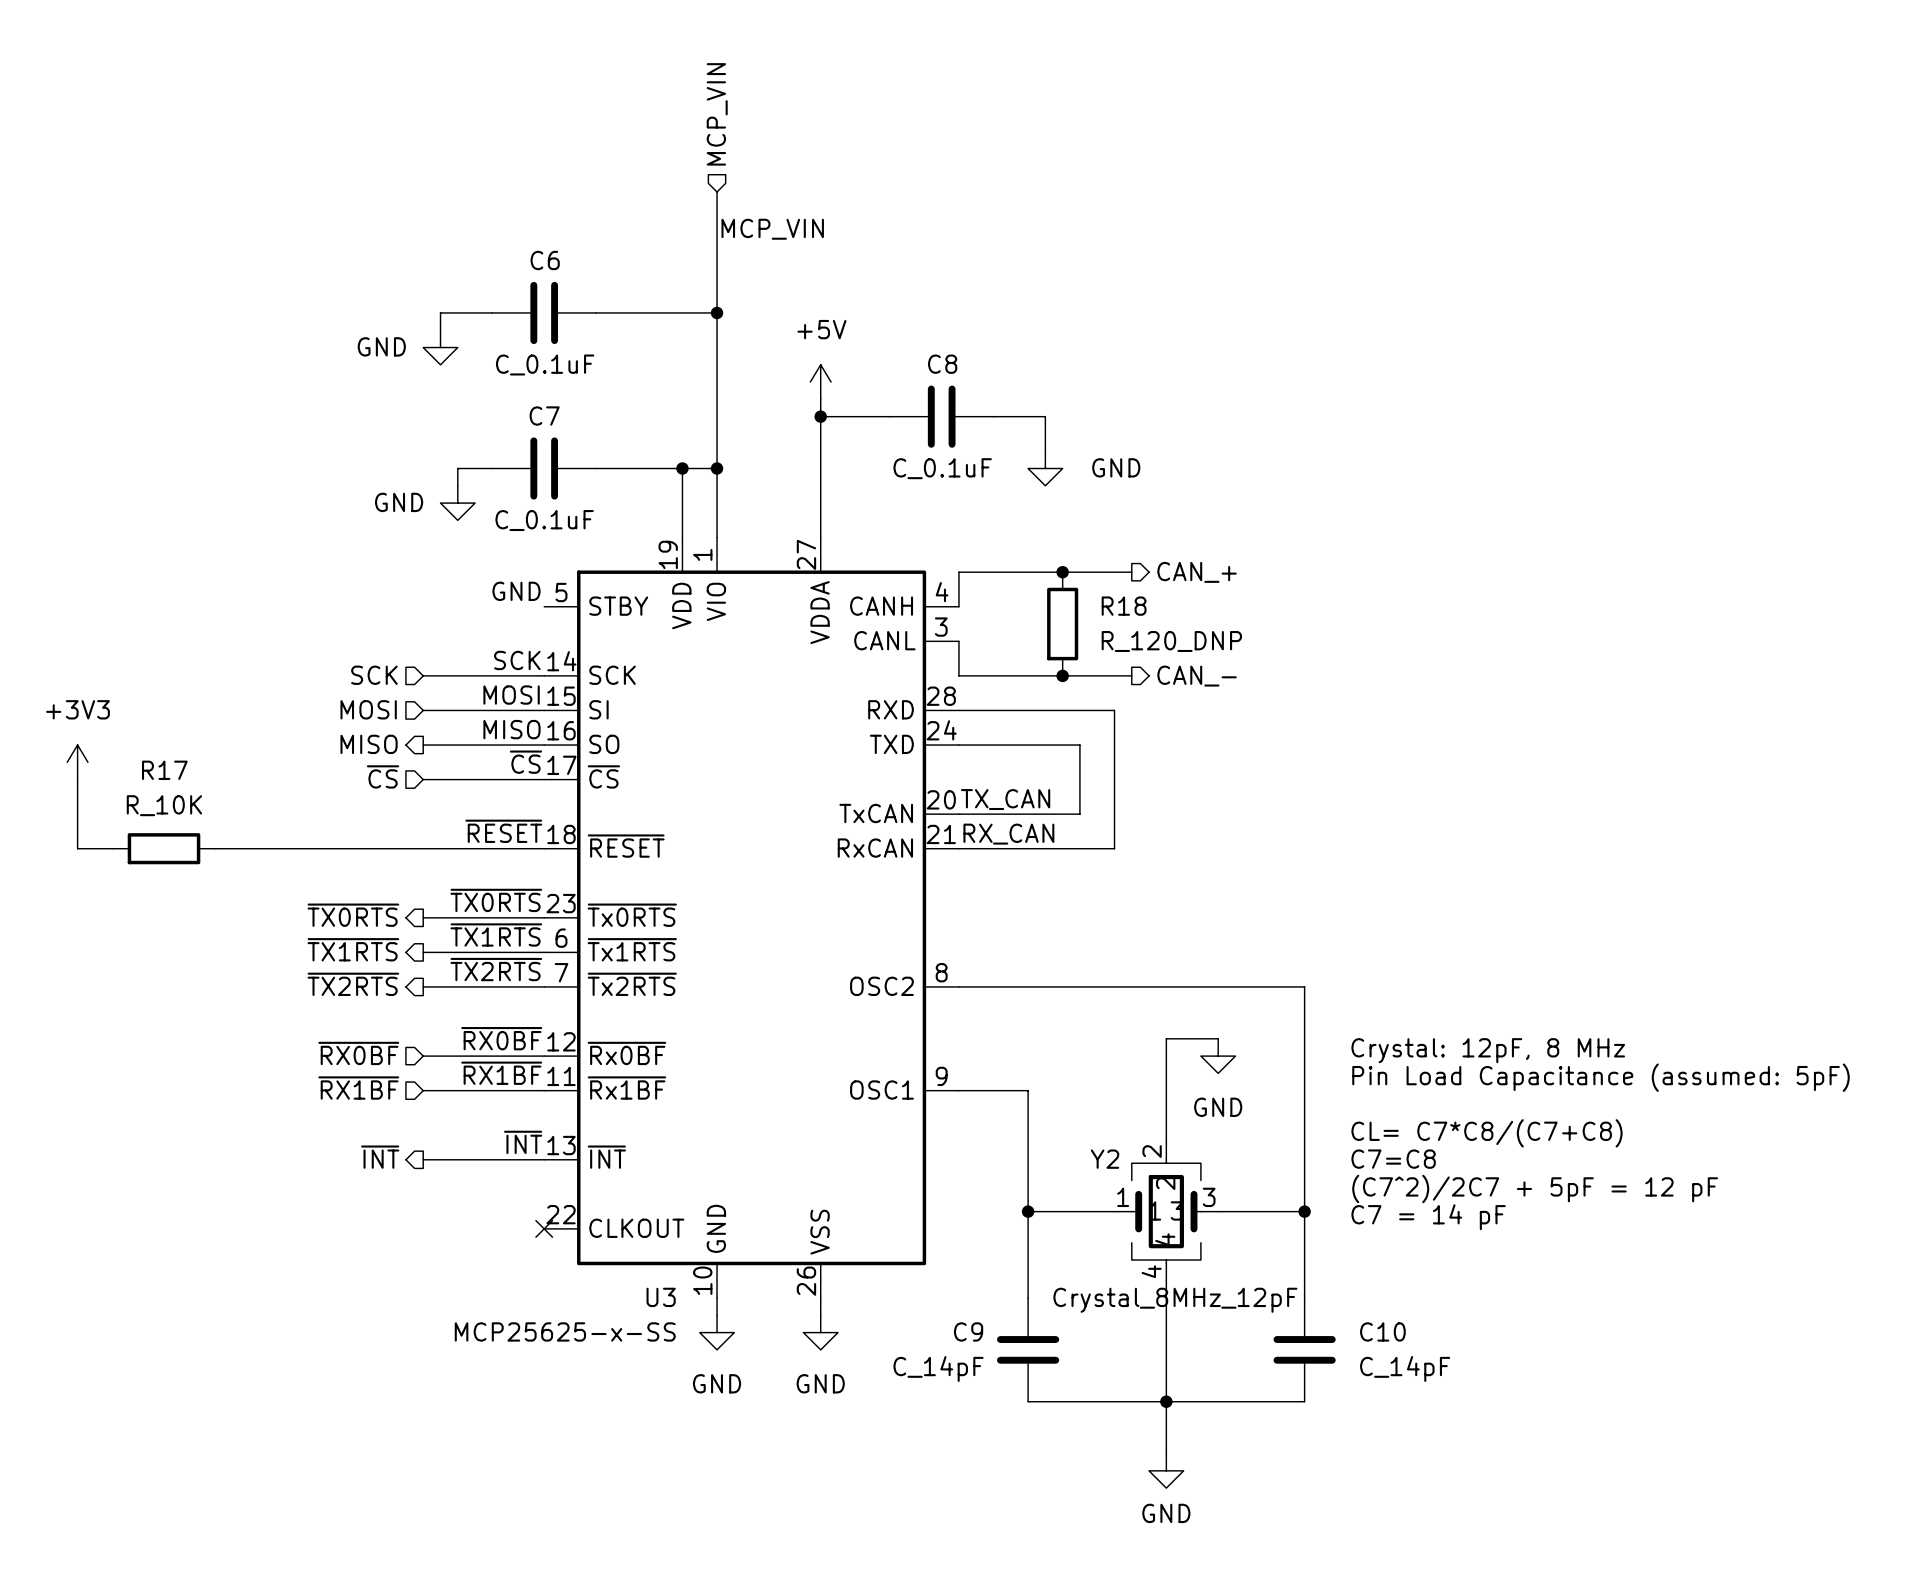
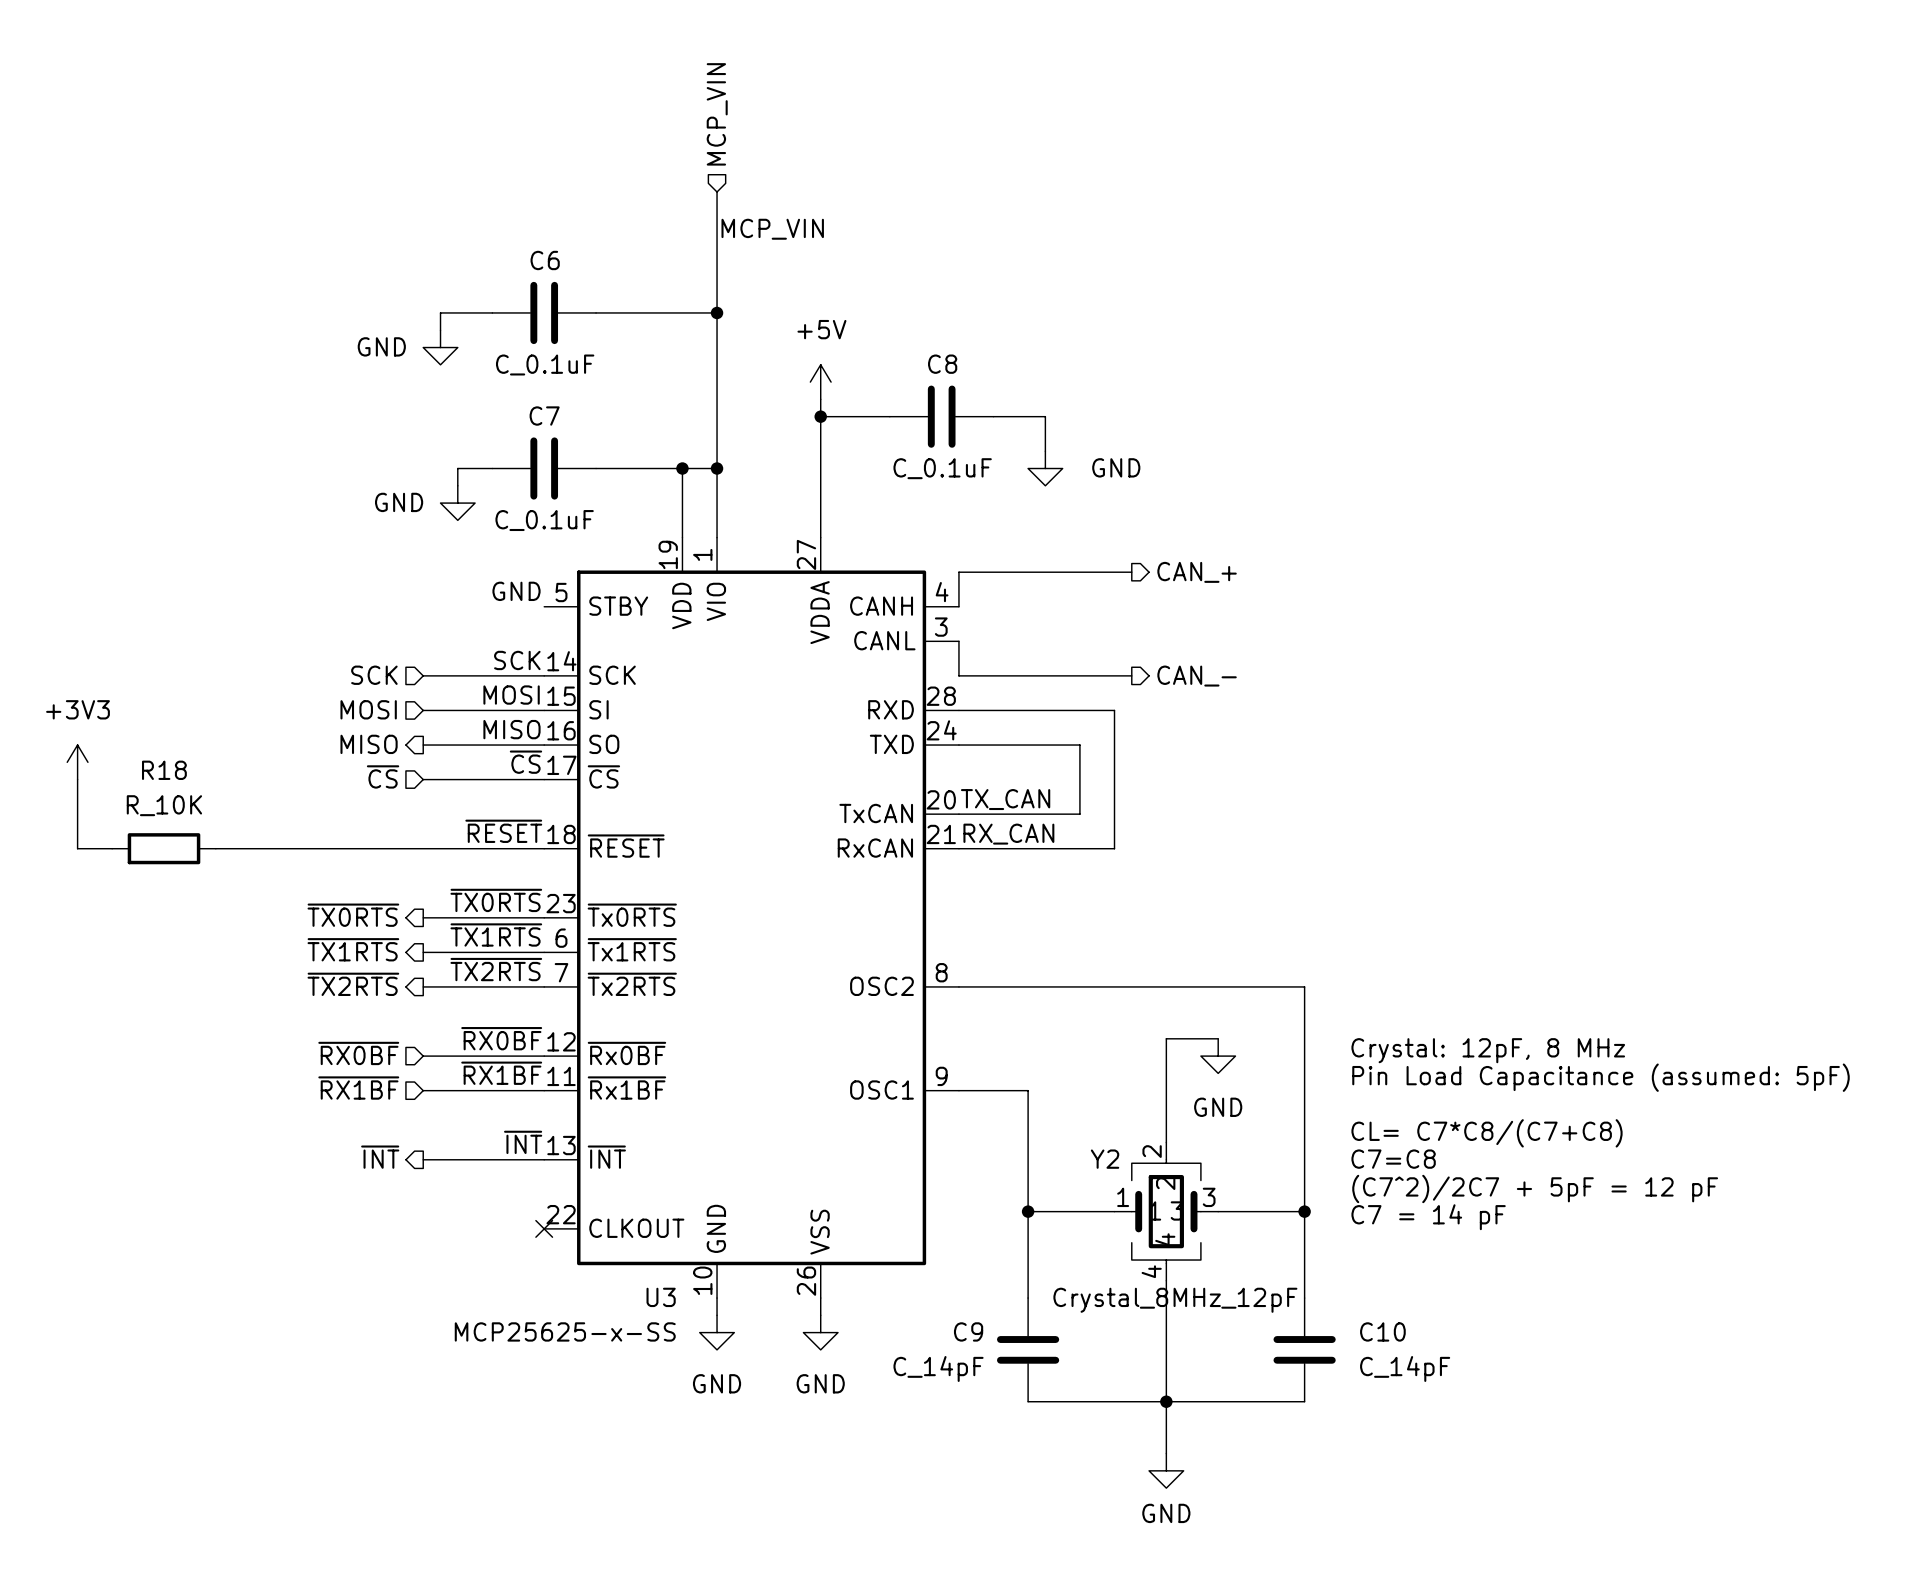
junction: (1062, 572) -> none
R18: R_120_DNP (1062, 624) -> none
junction: (1062, 675) -> none
R17 name: R17 (164, 770) -> R18 (164, 770)

